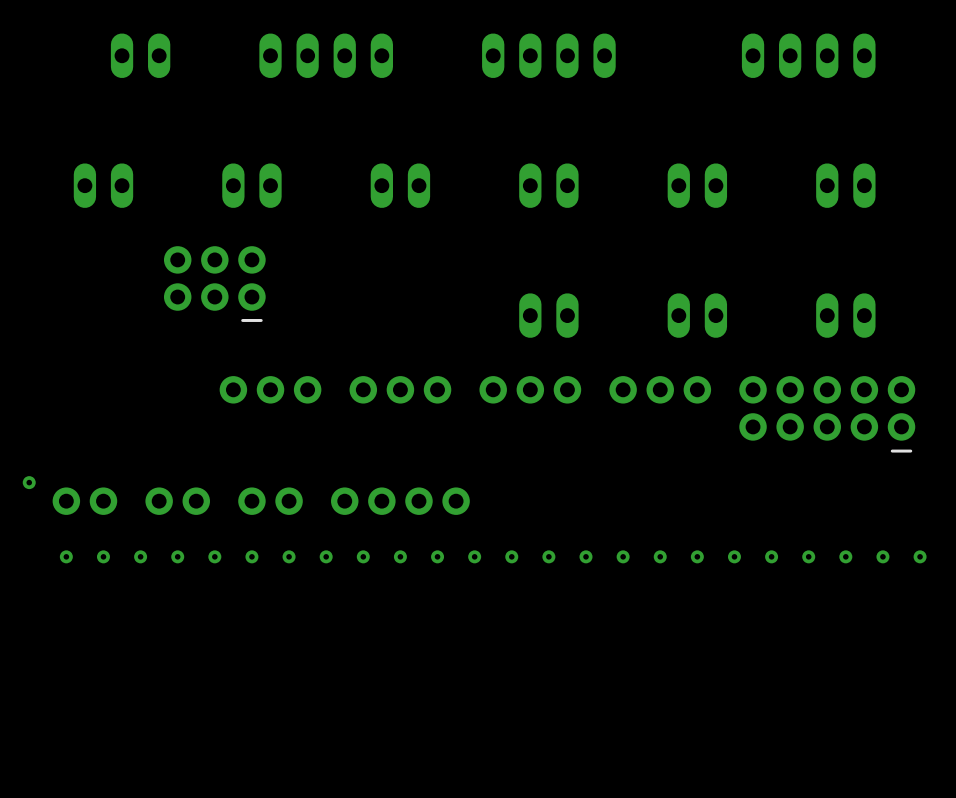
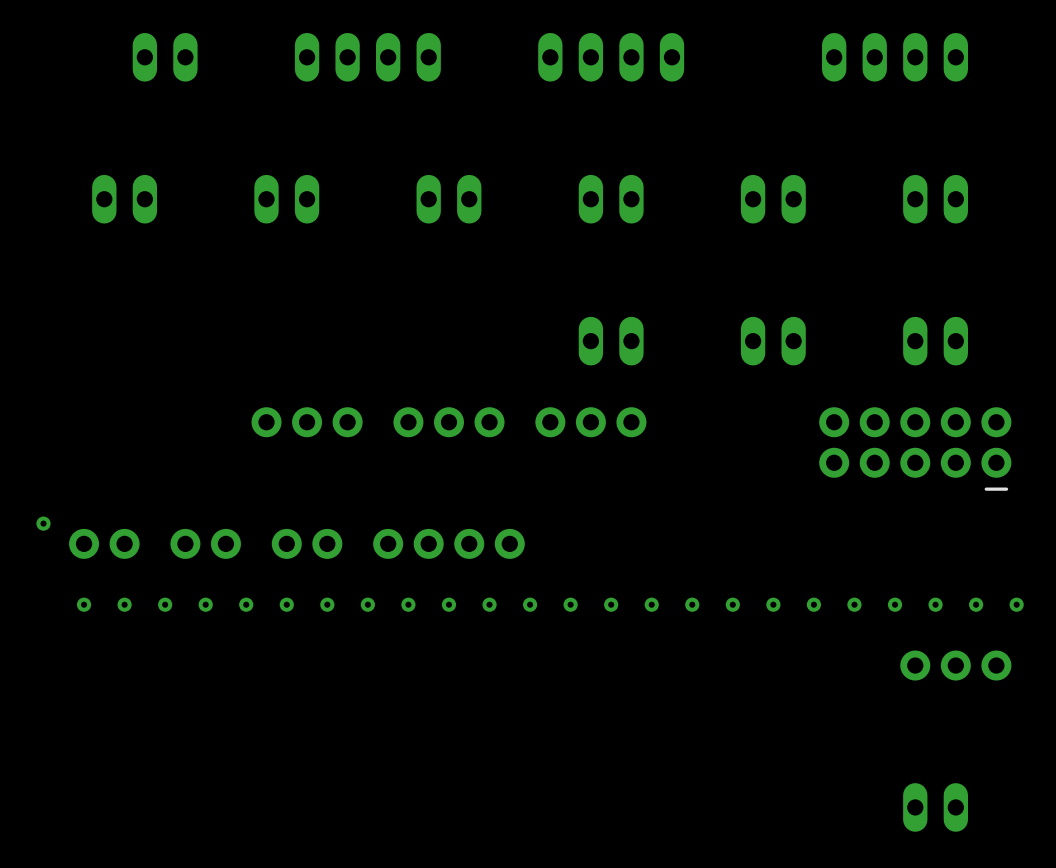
part: (214, 284) -> none
part position: (660, 389) -> (955, 665)
part: none -> (935, 807)

